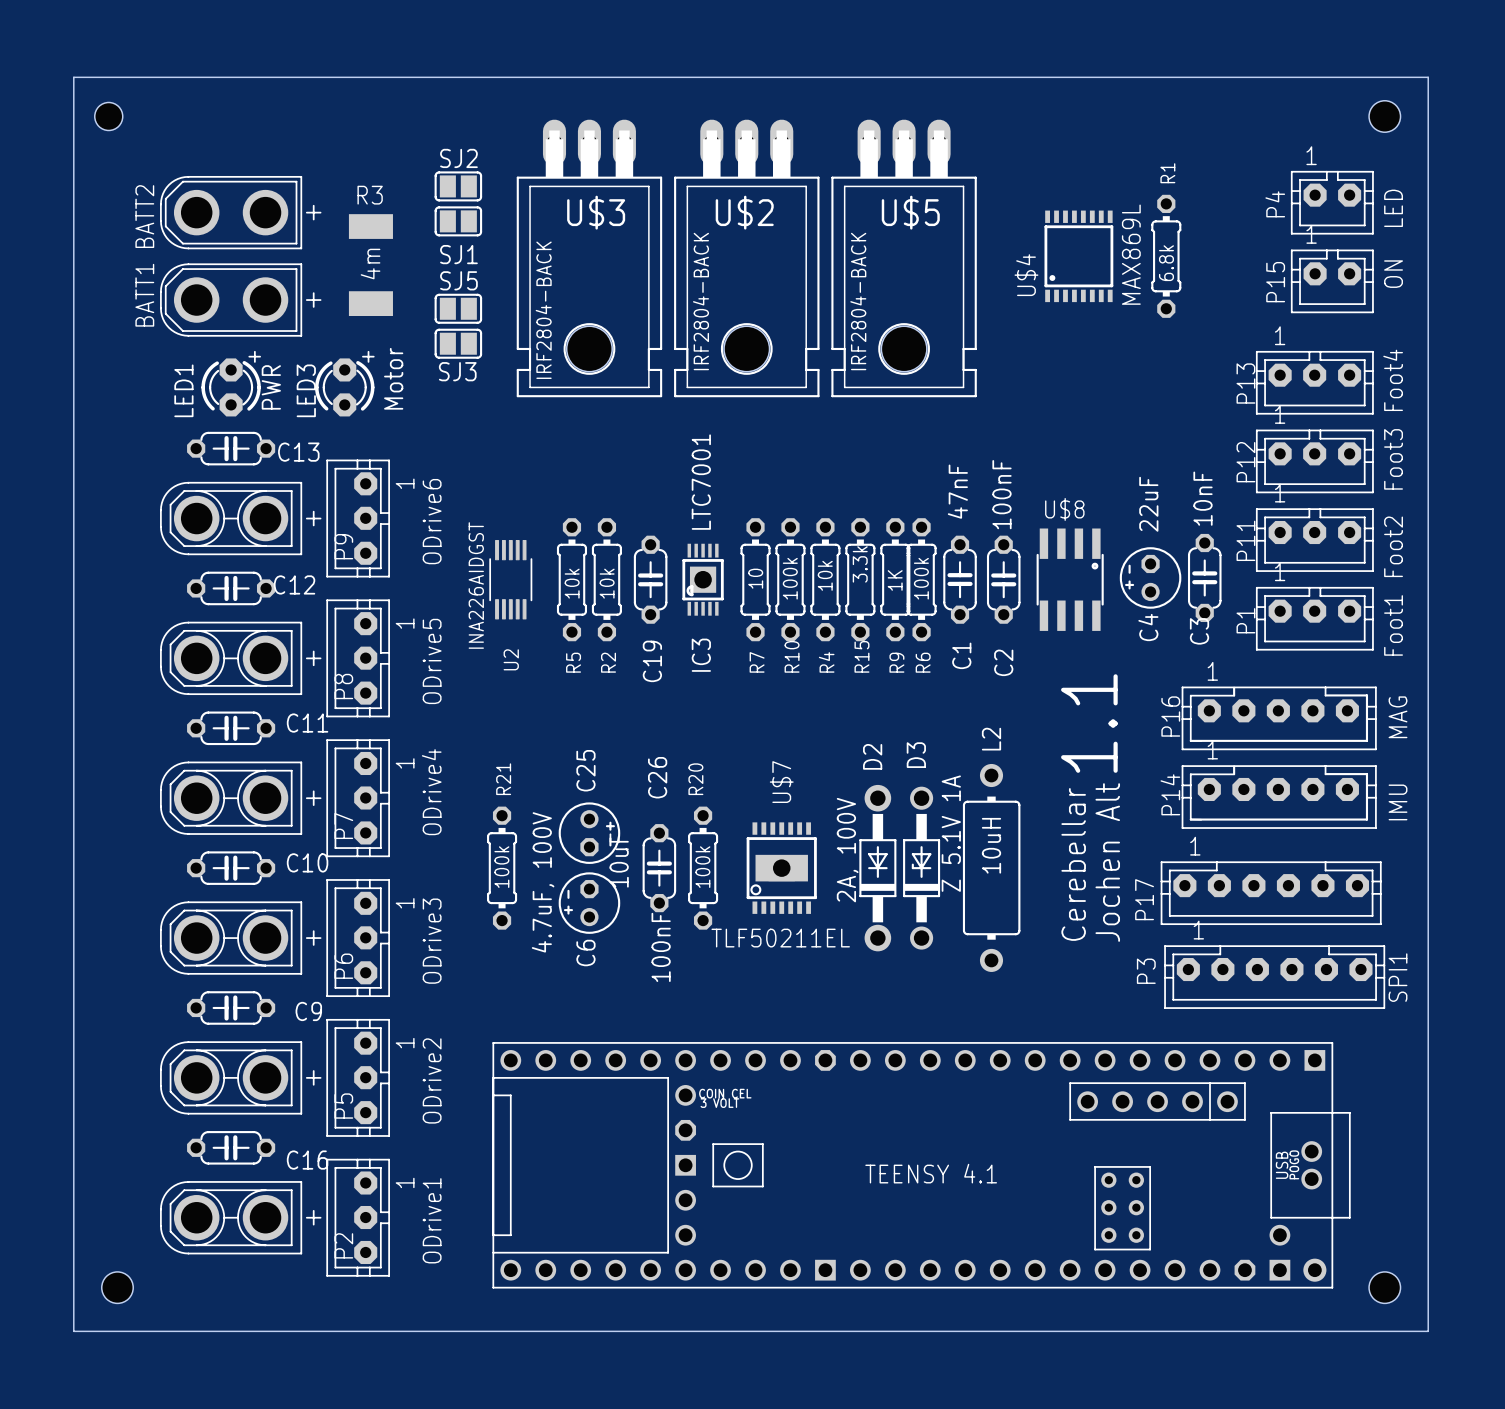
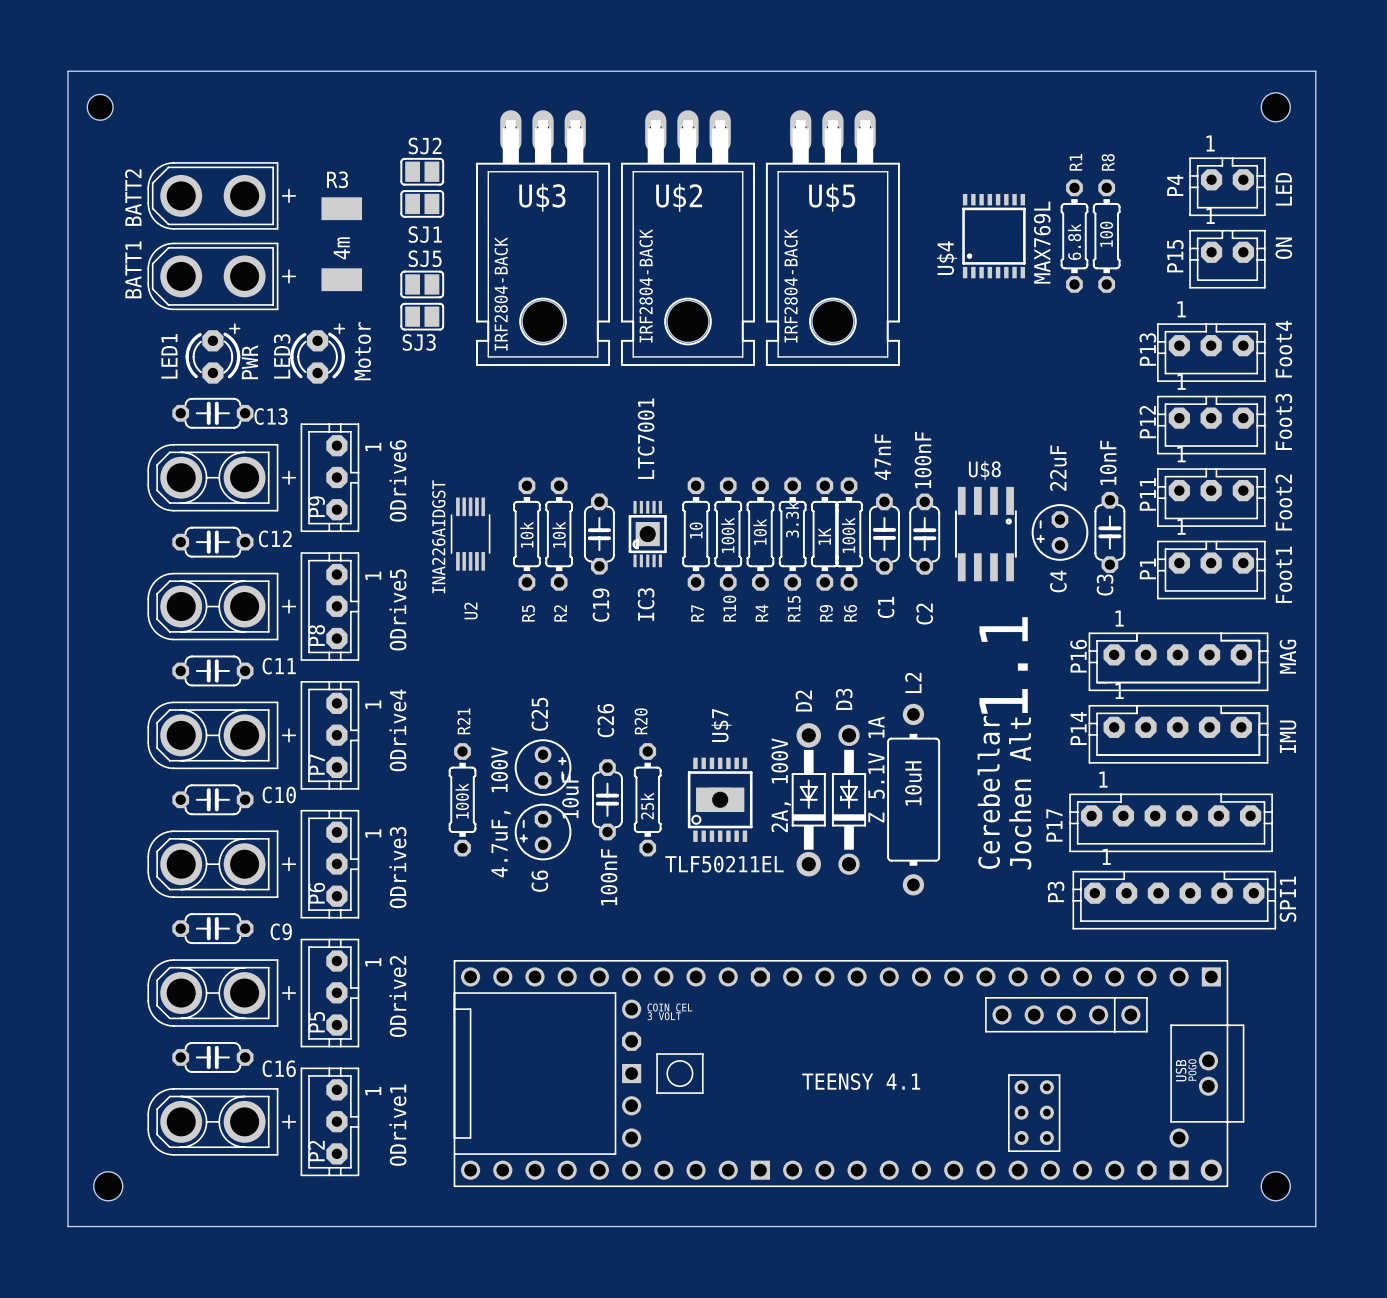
U$4 value: MAX869L (1131, 254) -> MAX769L (1042, 242)
R8: none -> 100 (1106, 236)
R20 value: 100k (702, 867) -> 25k (647, 805)

